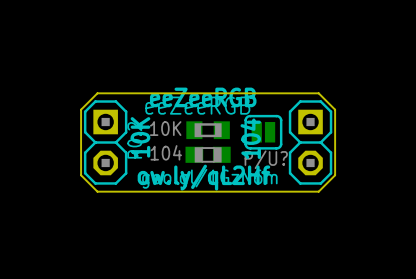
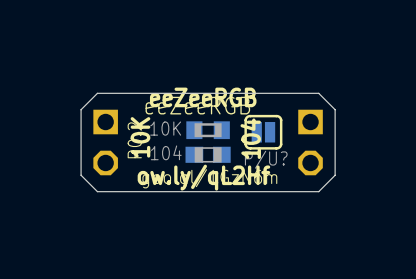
part side: bottom (105, 142) -> top (105, 142)
part side: bottom (310, 142) -> top (310, 142)

